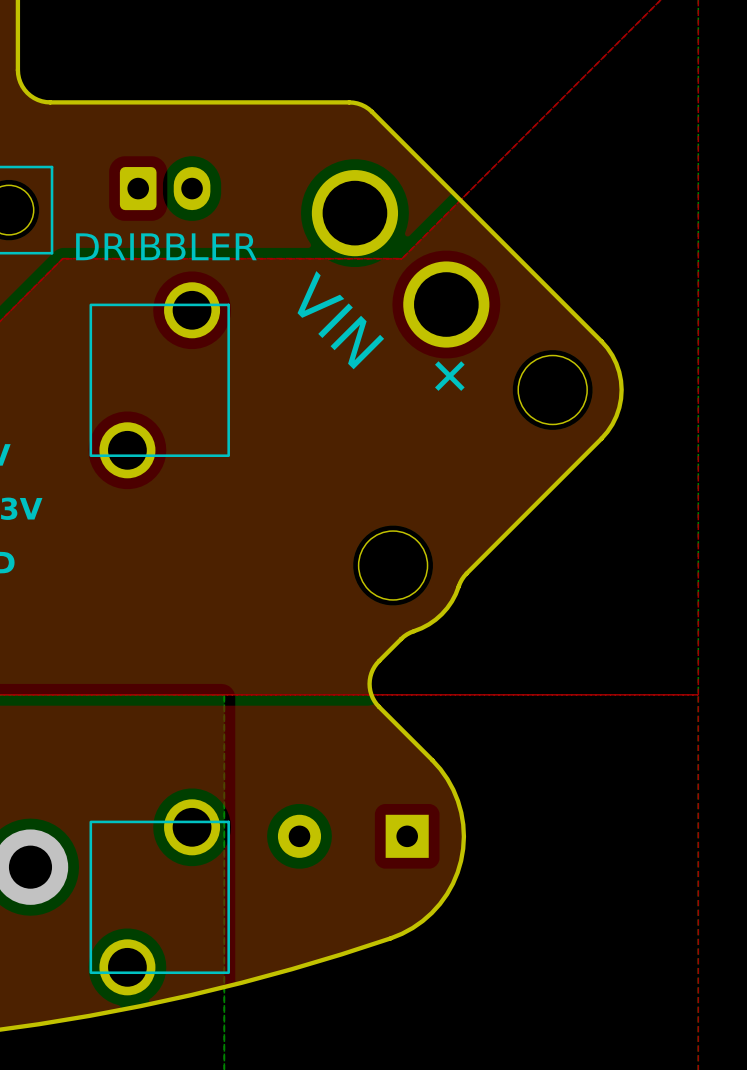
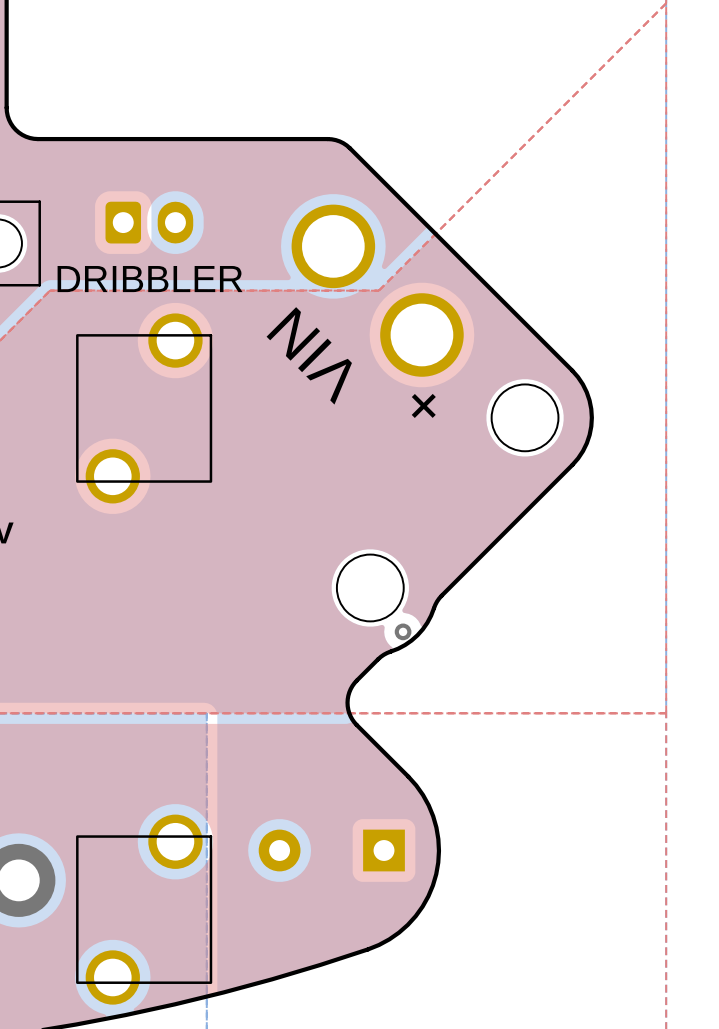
VIN name rotation: 0° (340, 320) -> 180° (309, 355)
via: none -> (403, 631)

